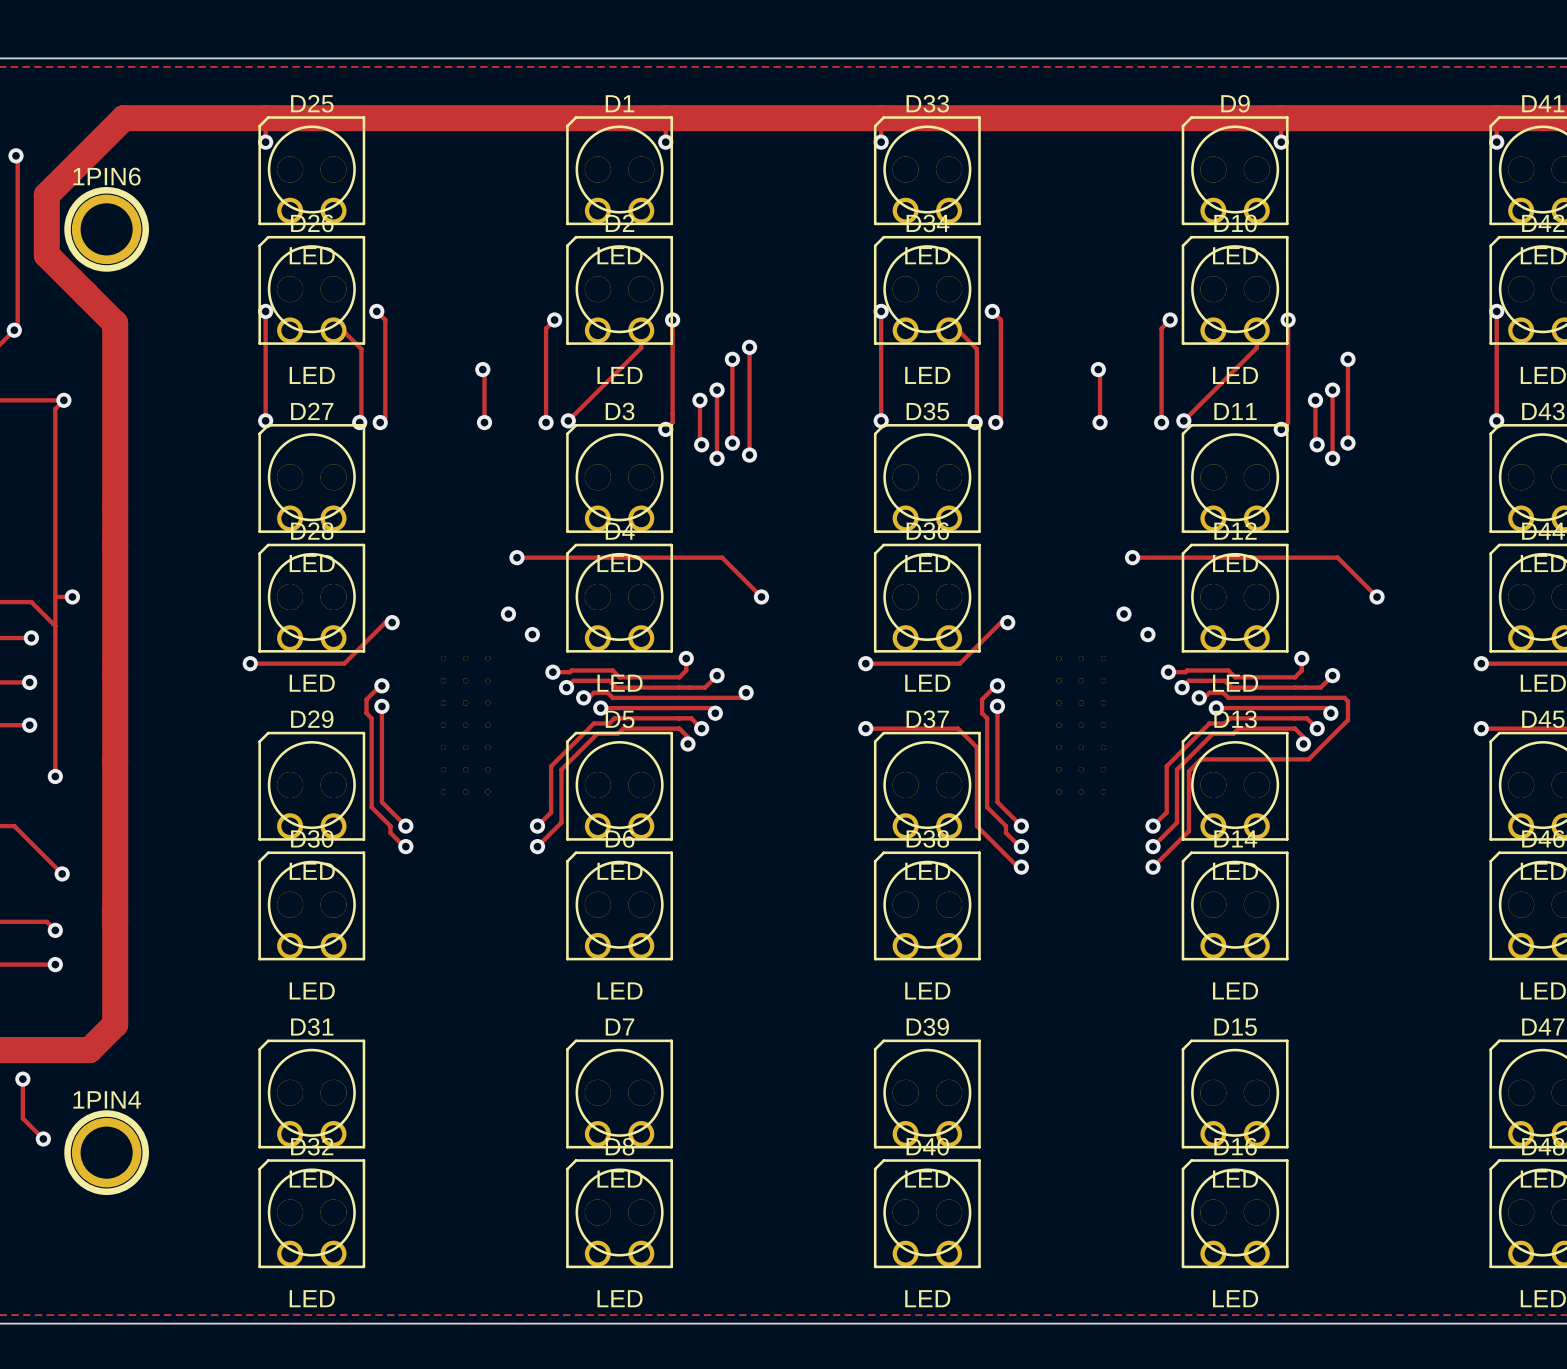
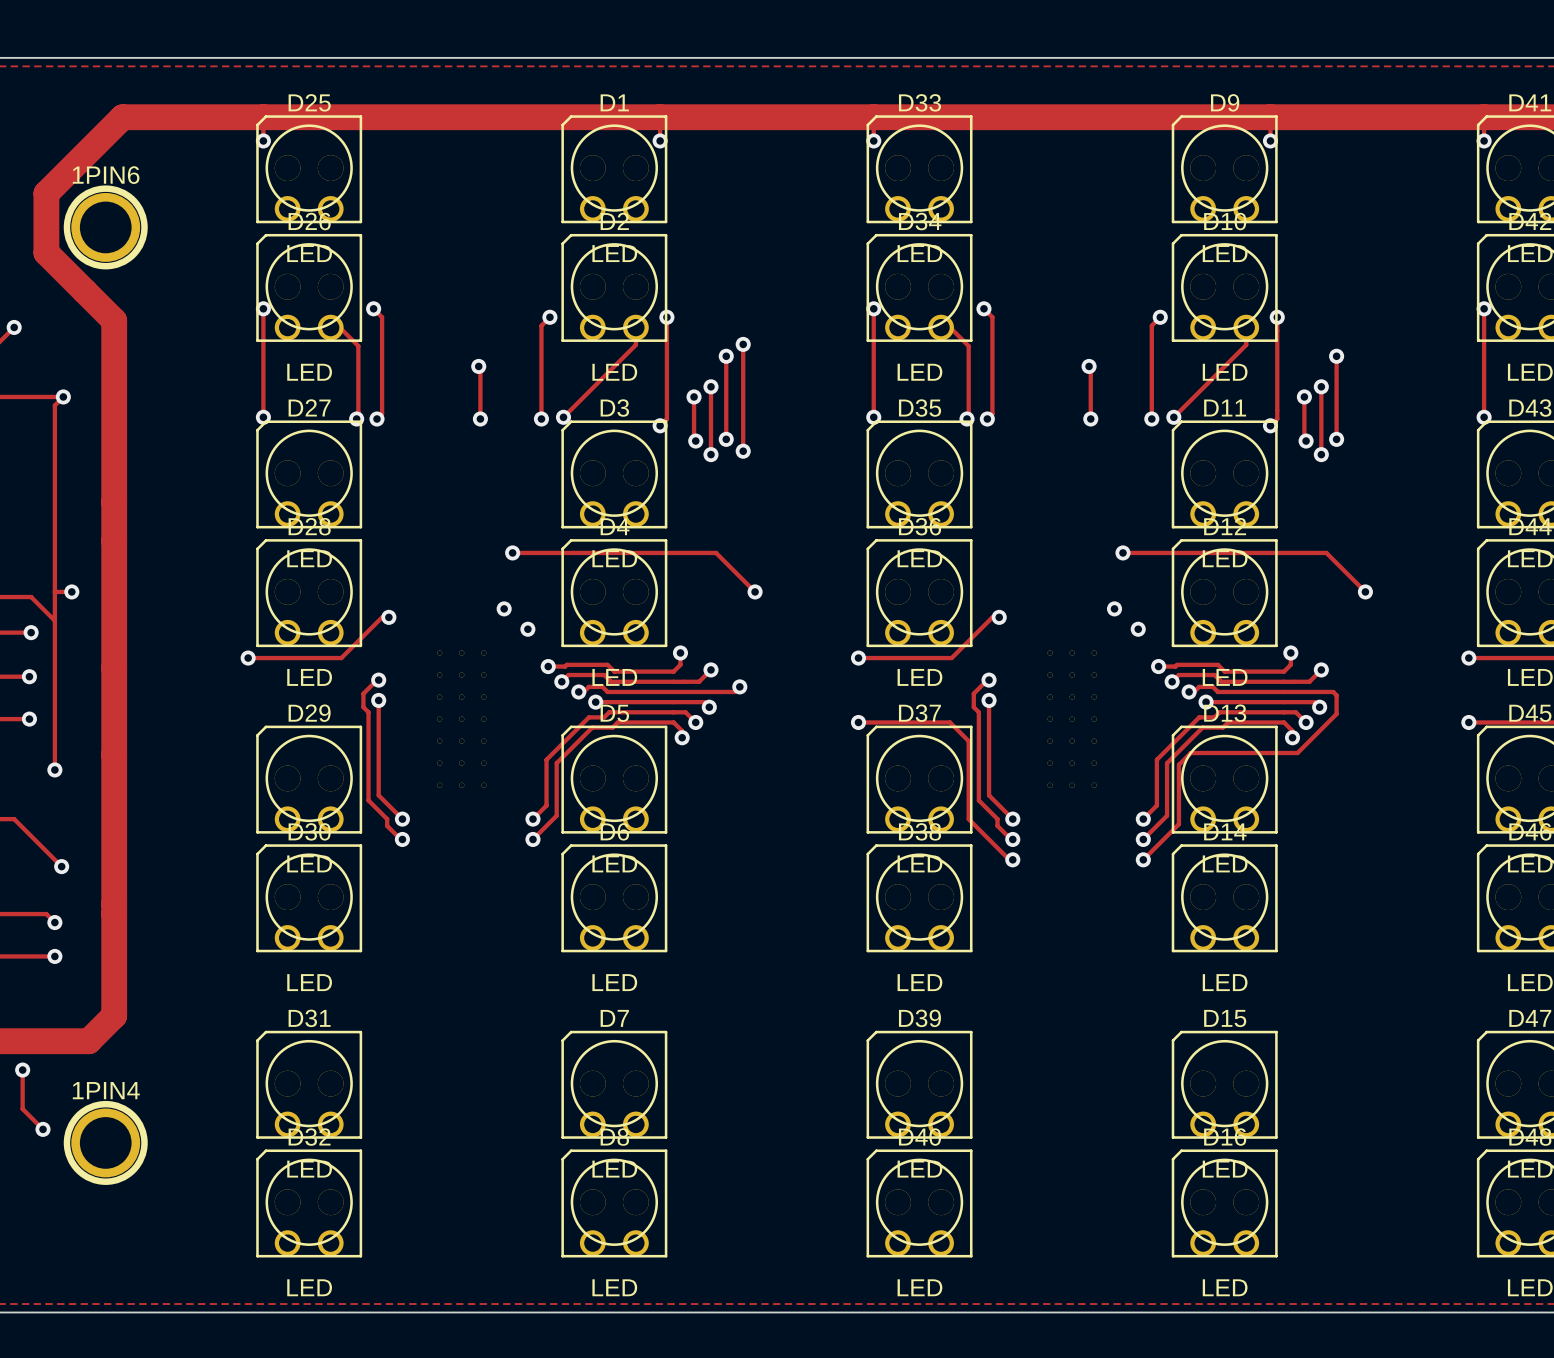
track: (16, 155) (17, 157) (17, 326) (14, 330) -> none
via: (16, 155) -> none

